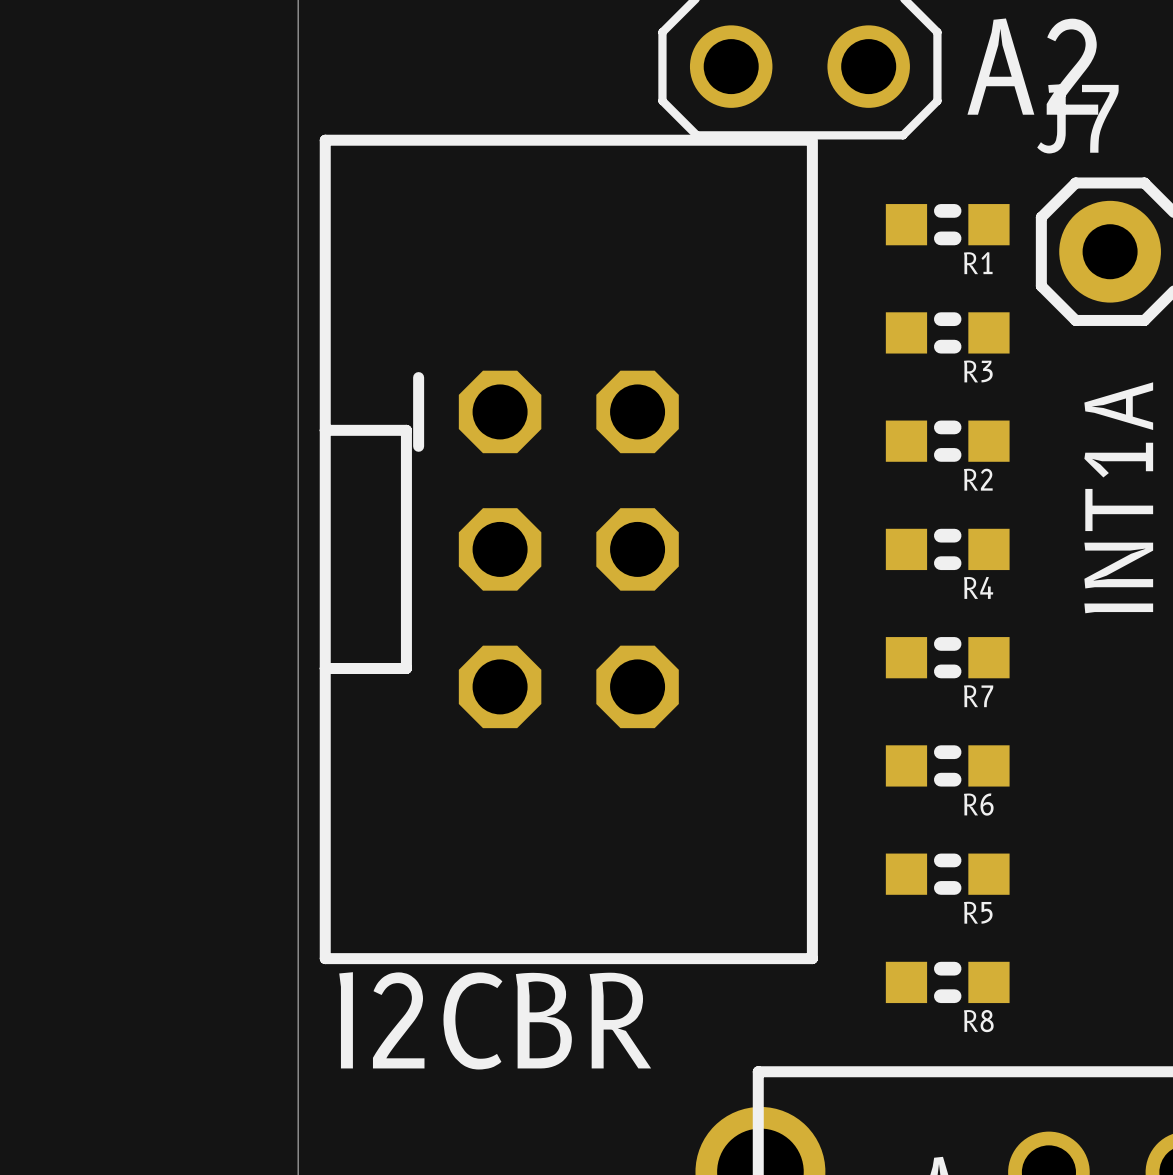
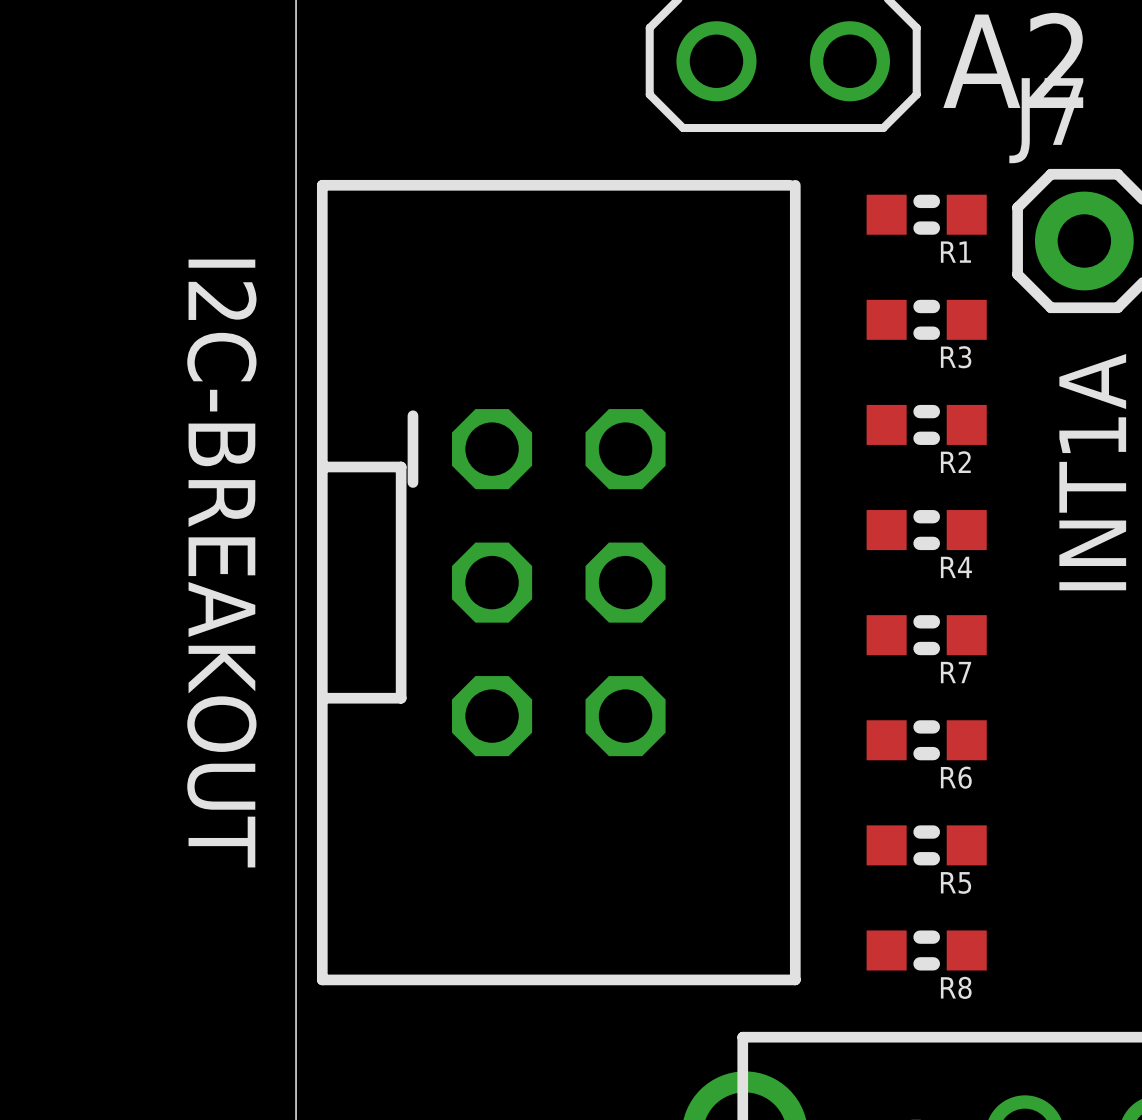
part position: (568, 549) -> (558, 582)
text: none -> I2C-BREAKOUT (221, 563)
text: I2CBR (495, 1020) -> none

